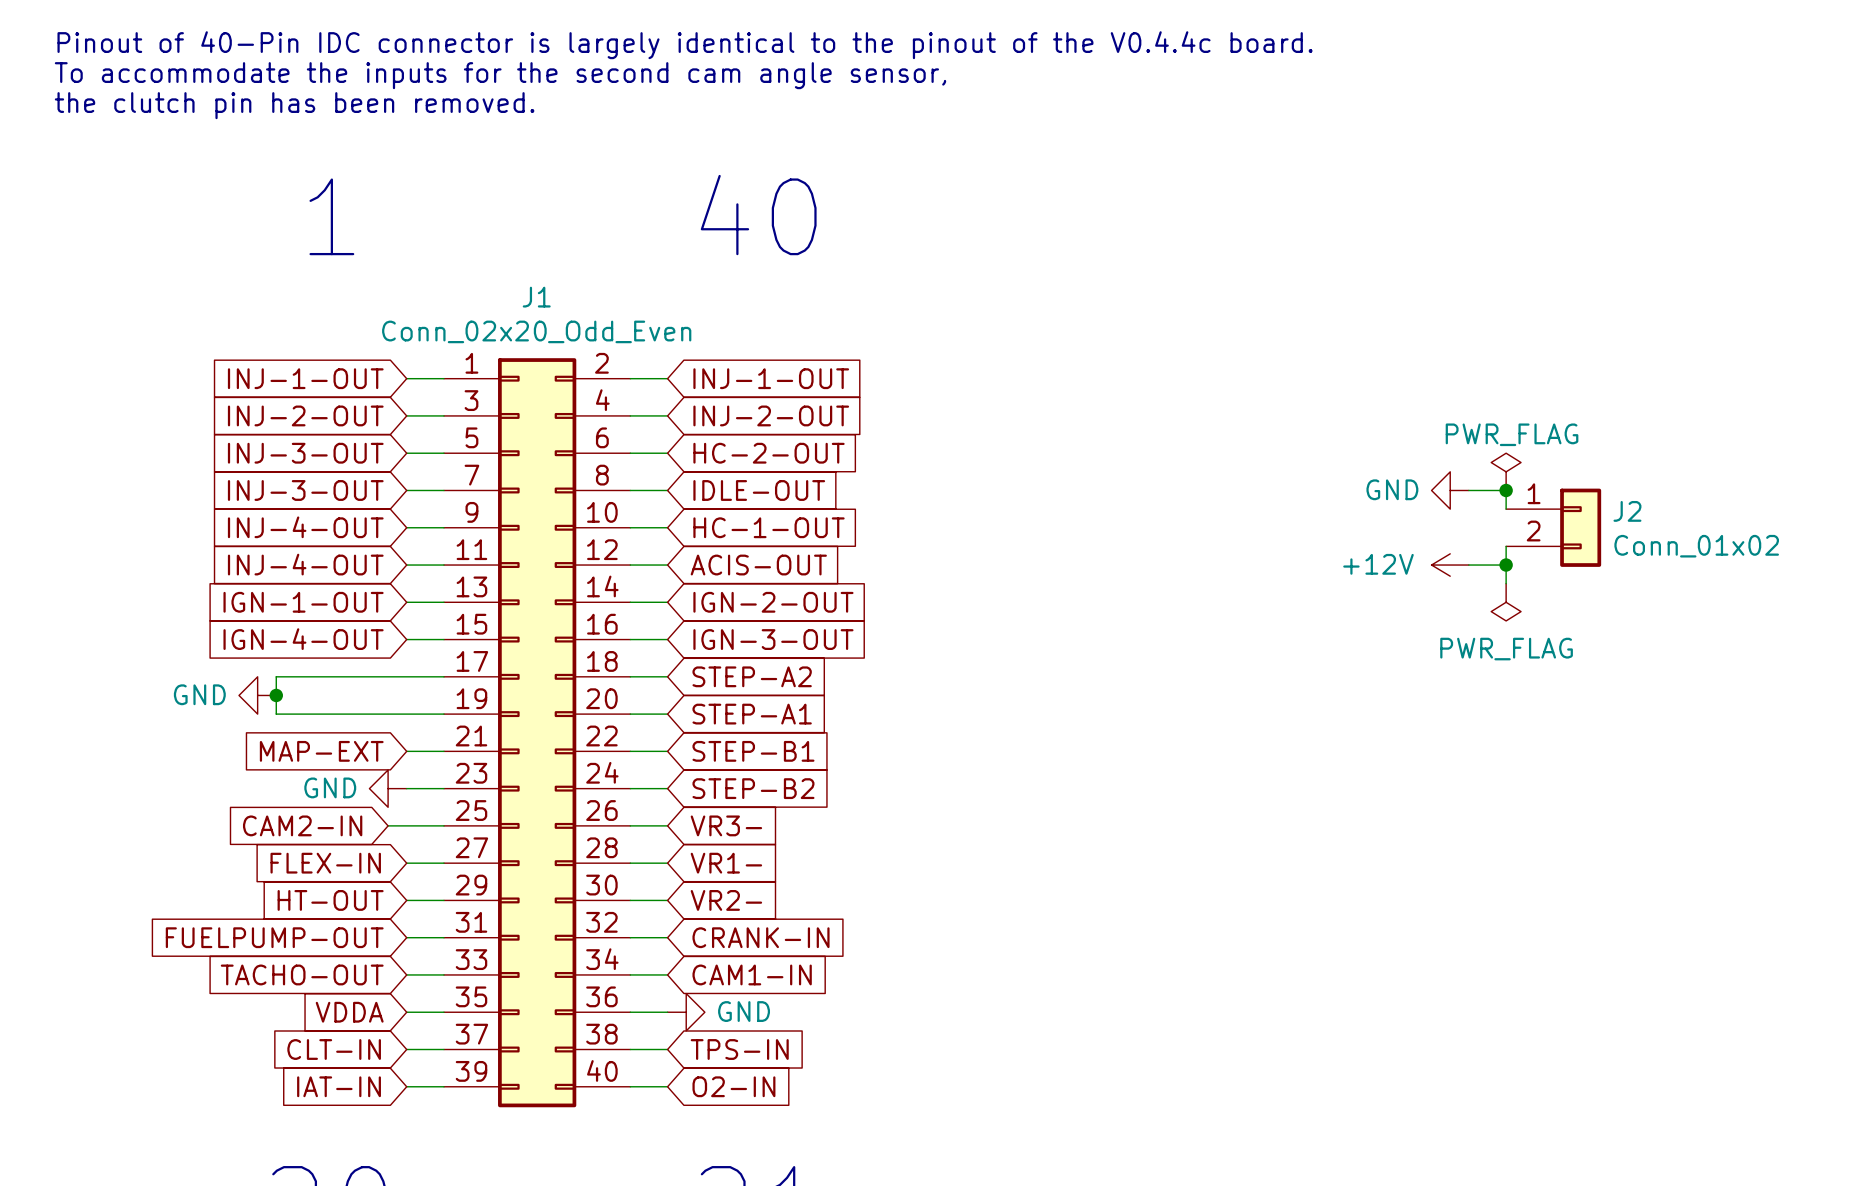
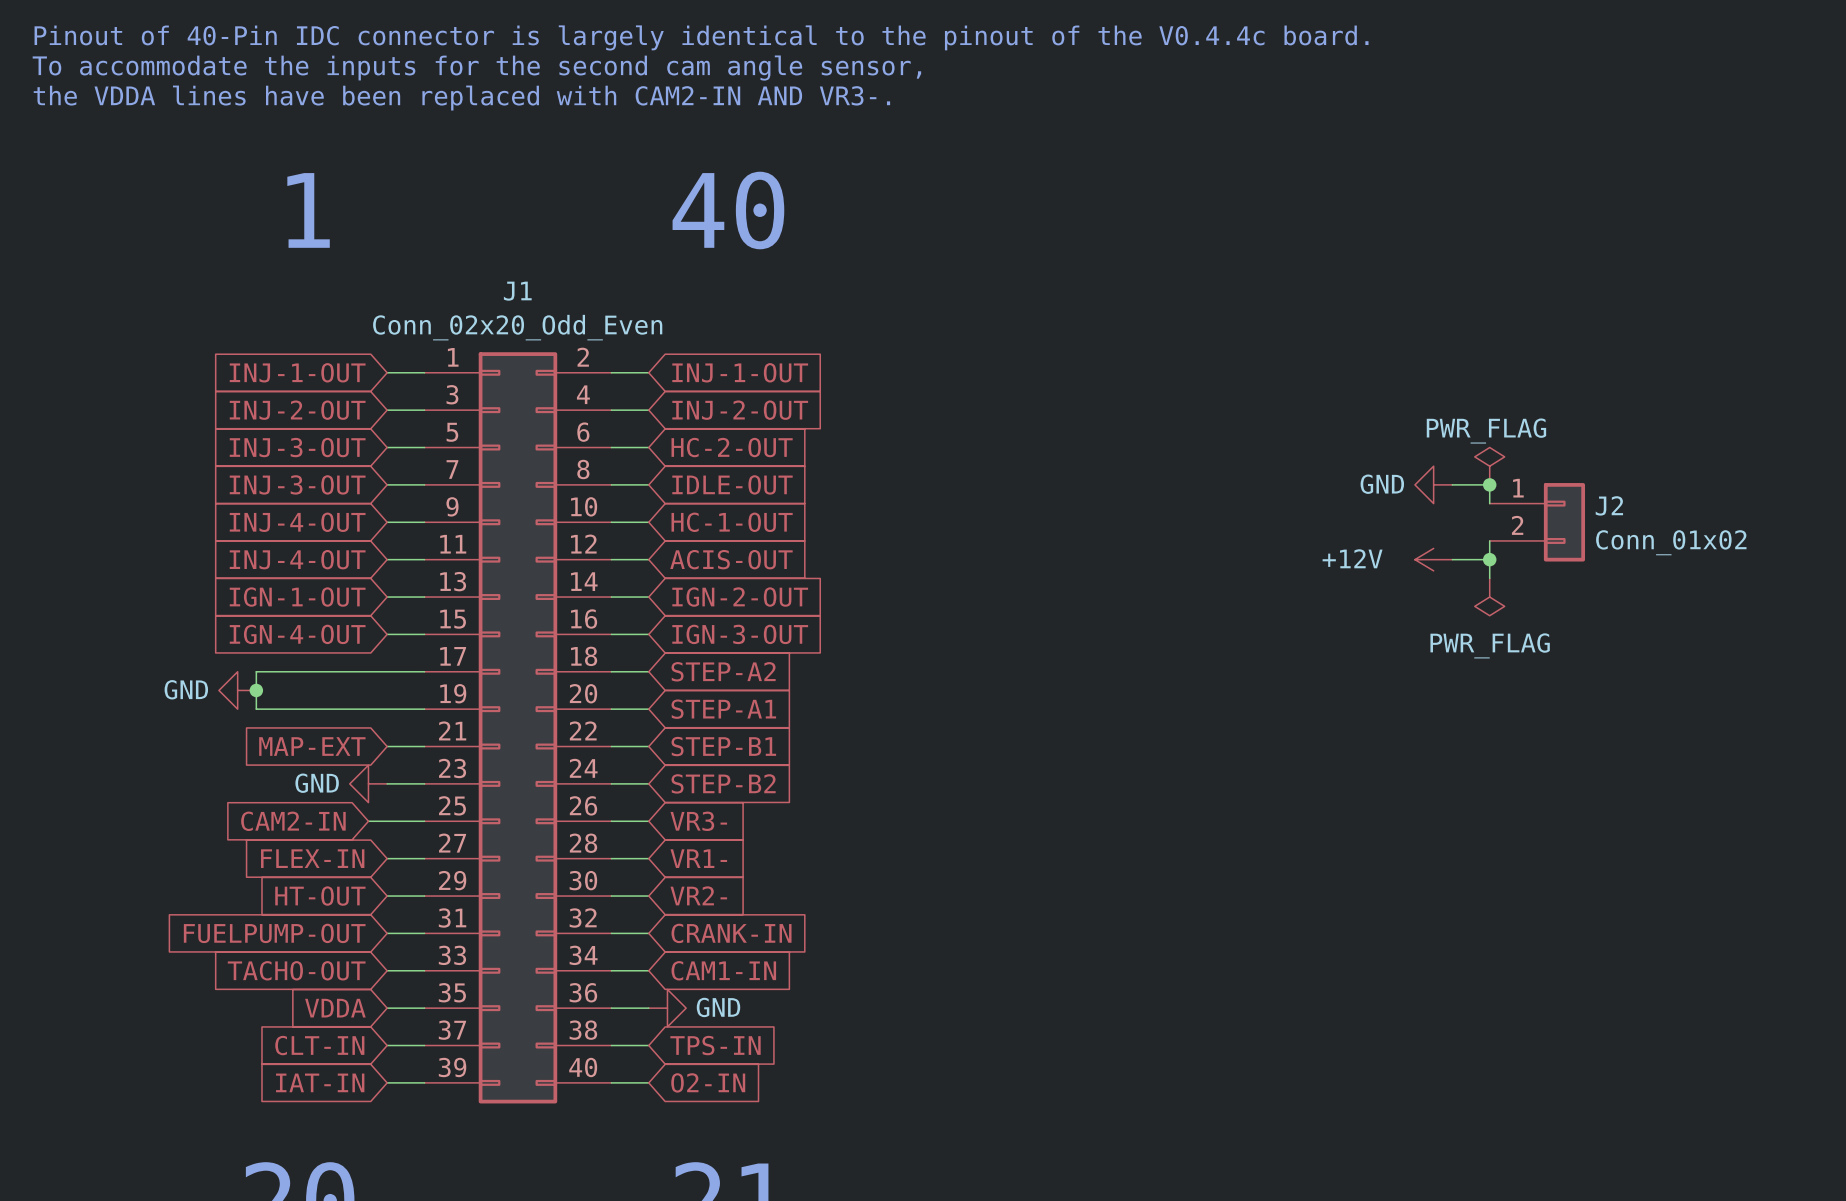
text: the clutch pin has been removed. (294, 105) -> the VDDA lines have been replaced with CAM2-IN AND VR3-. (461, 98)

